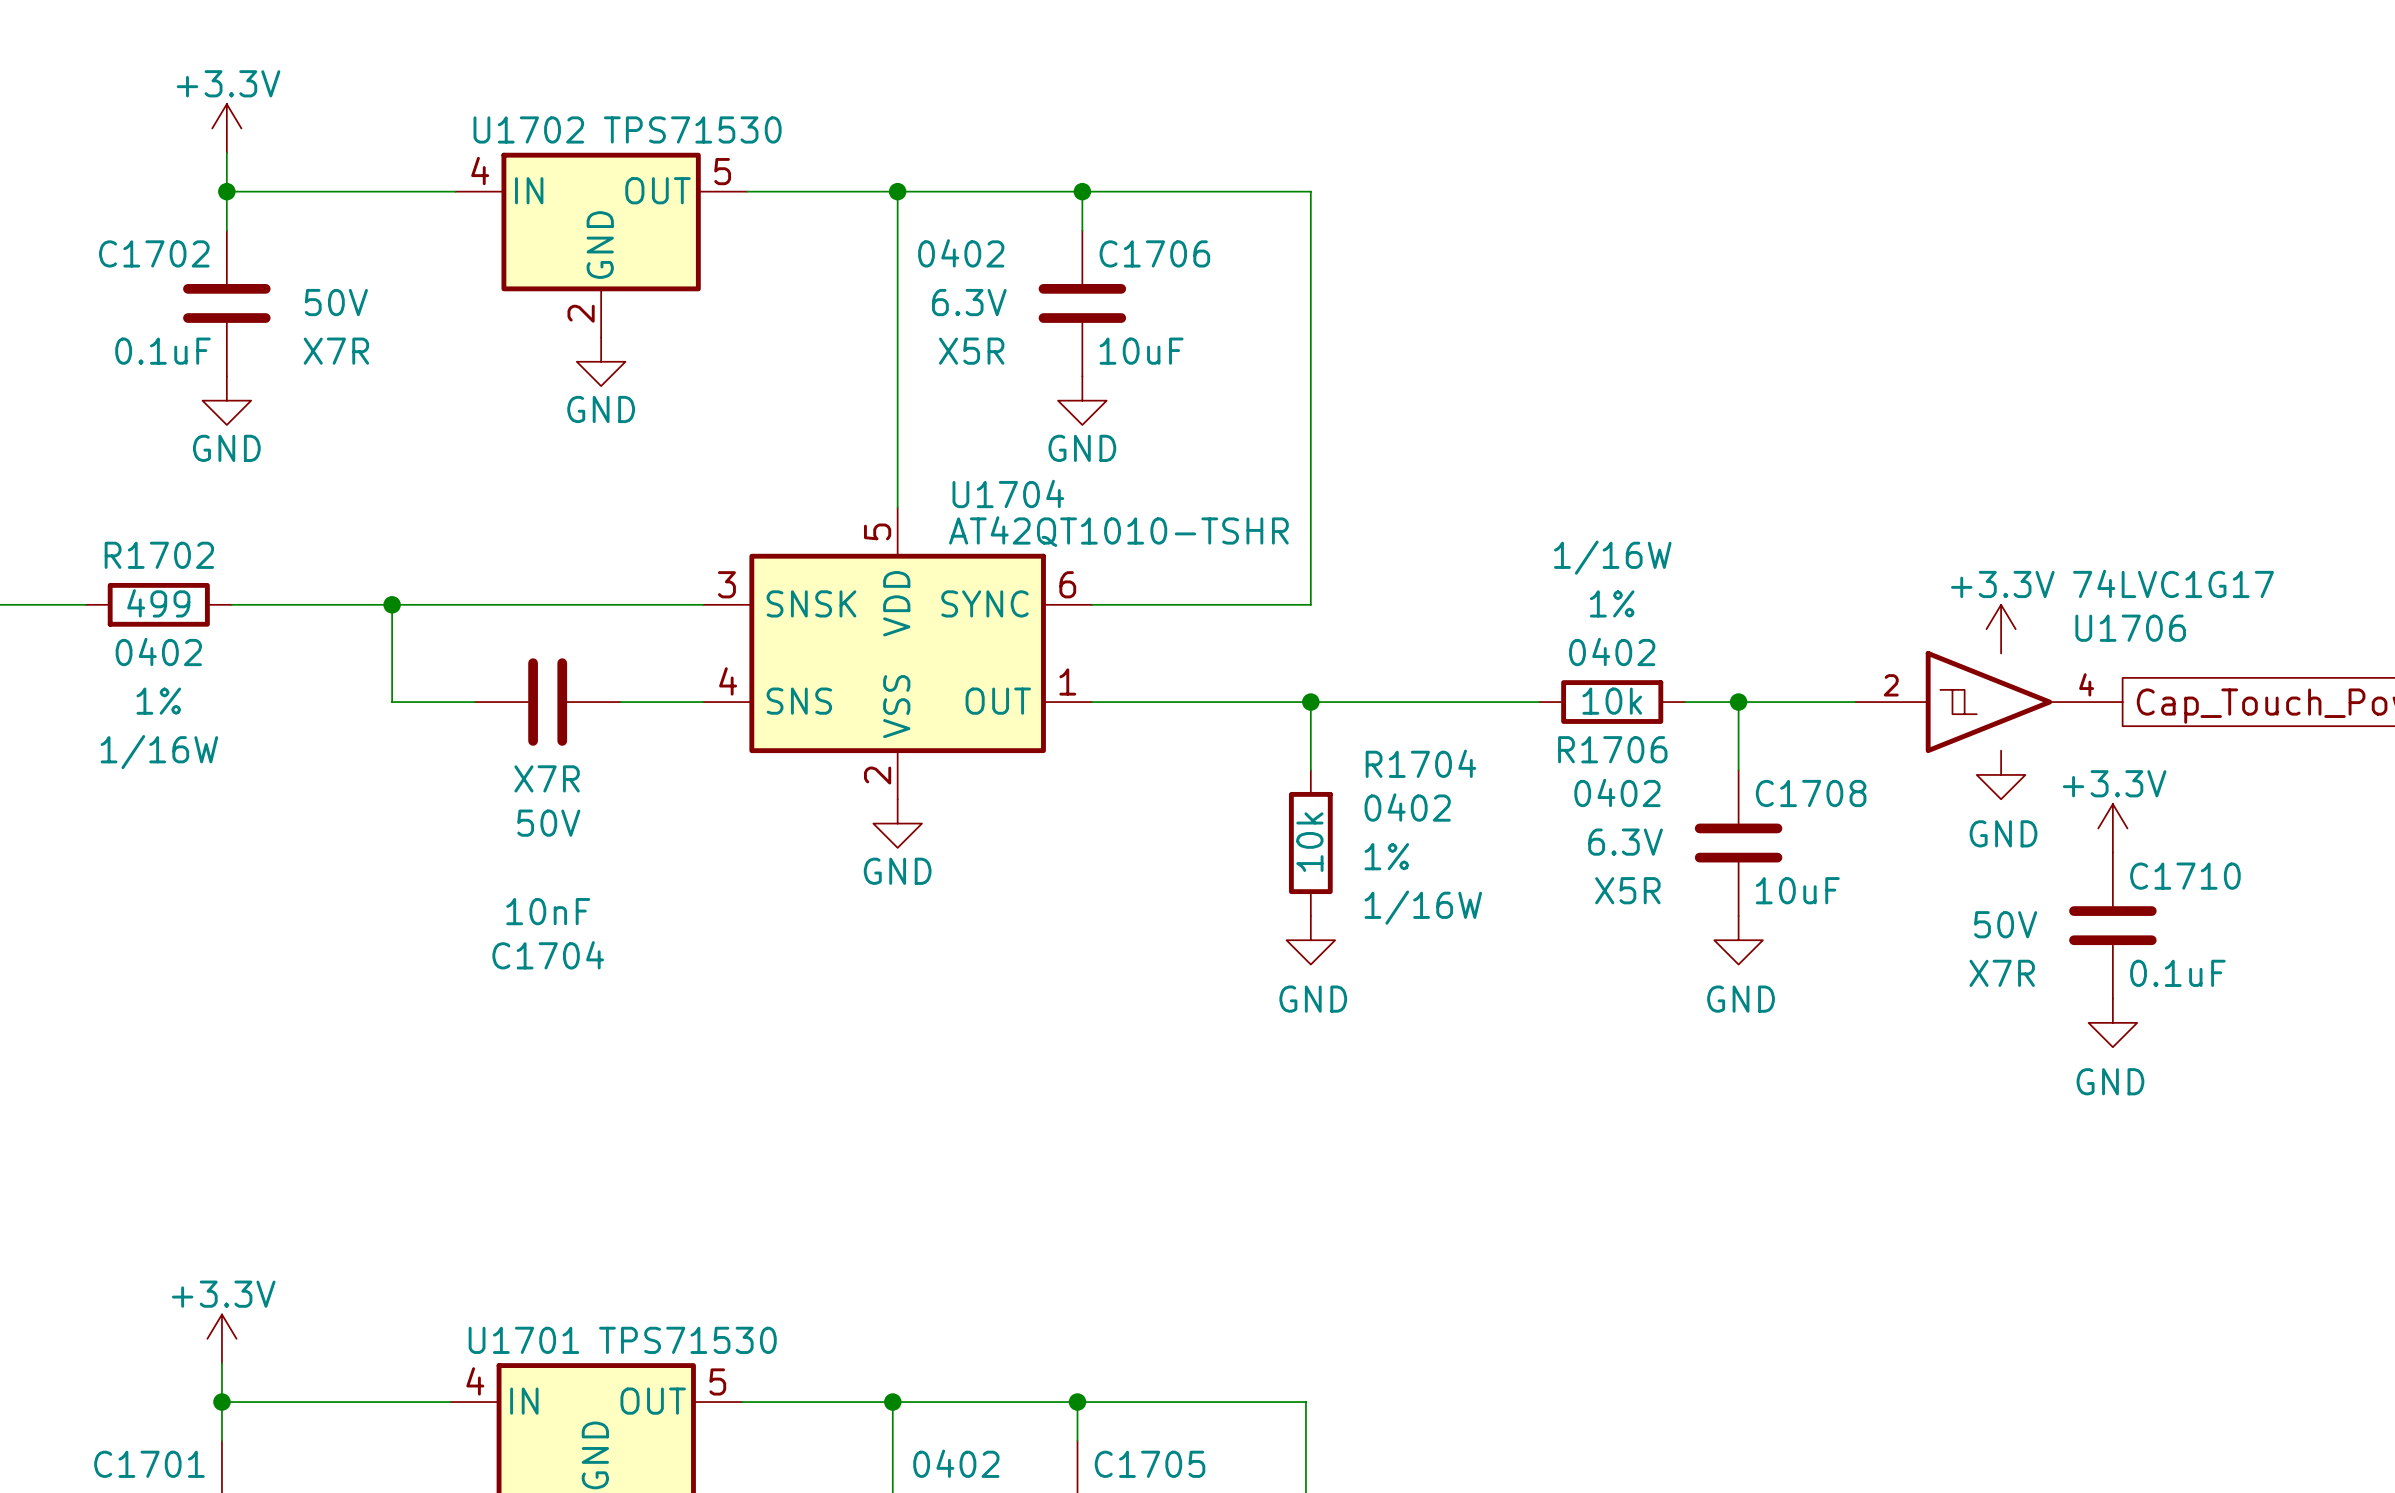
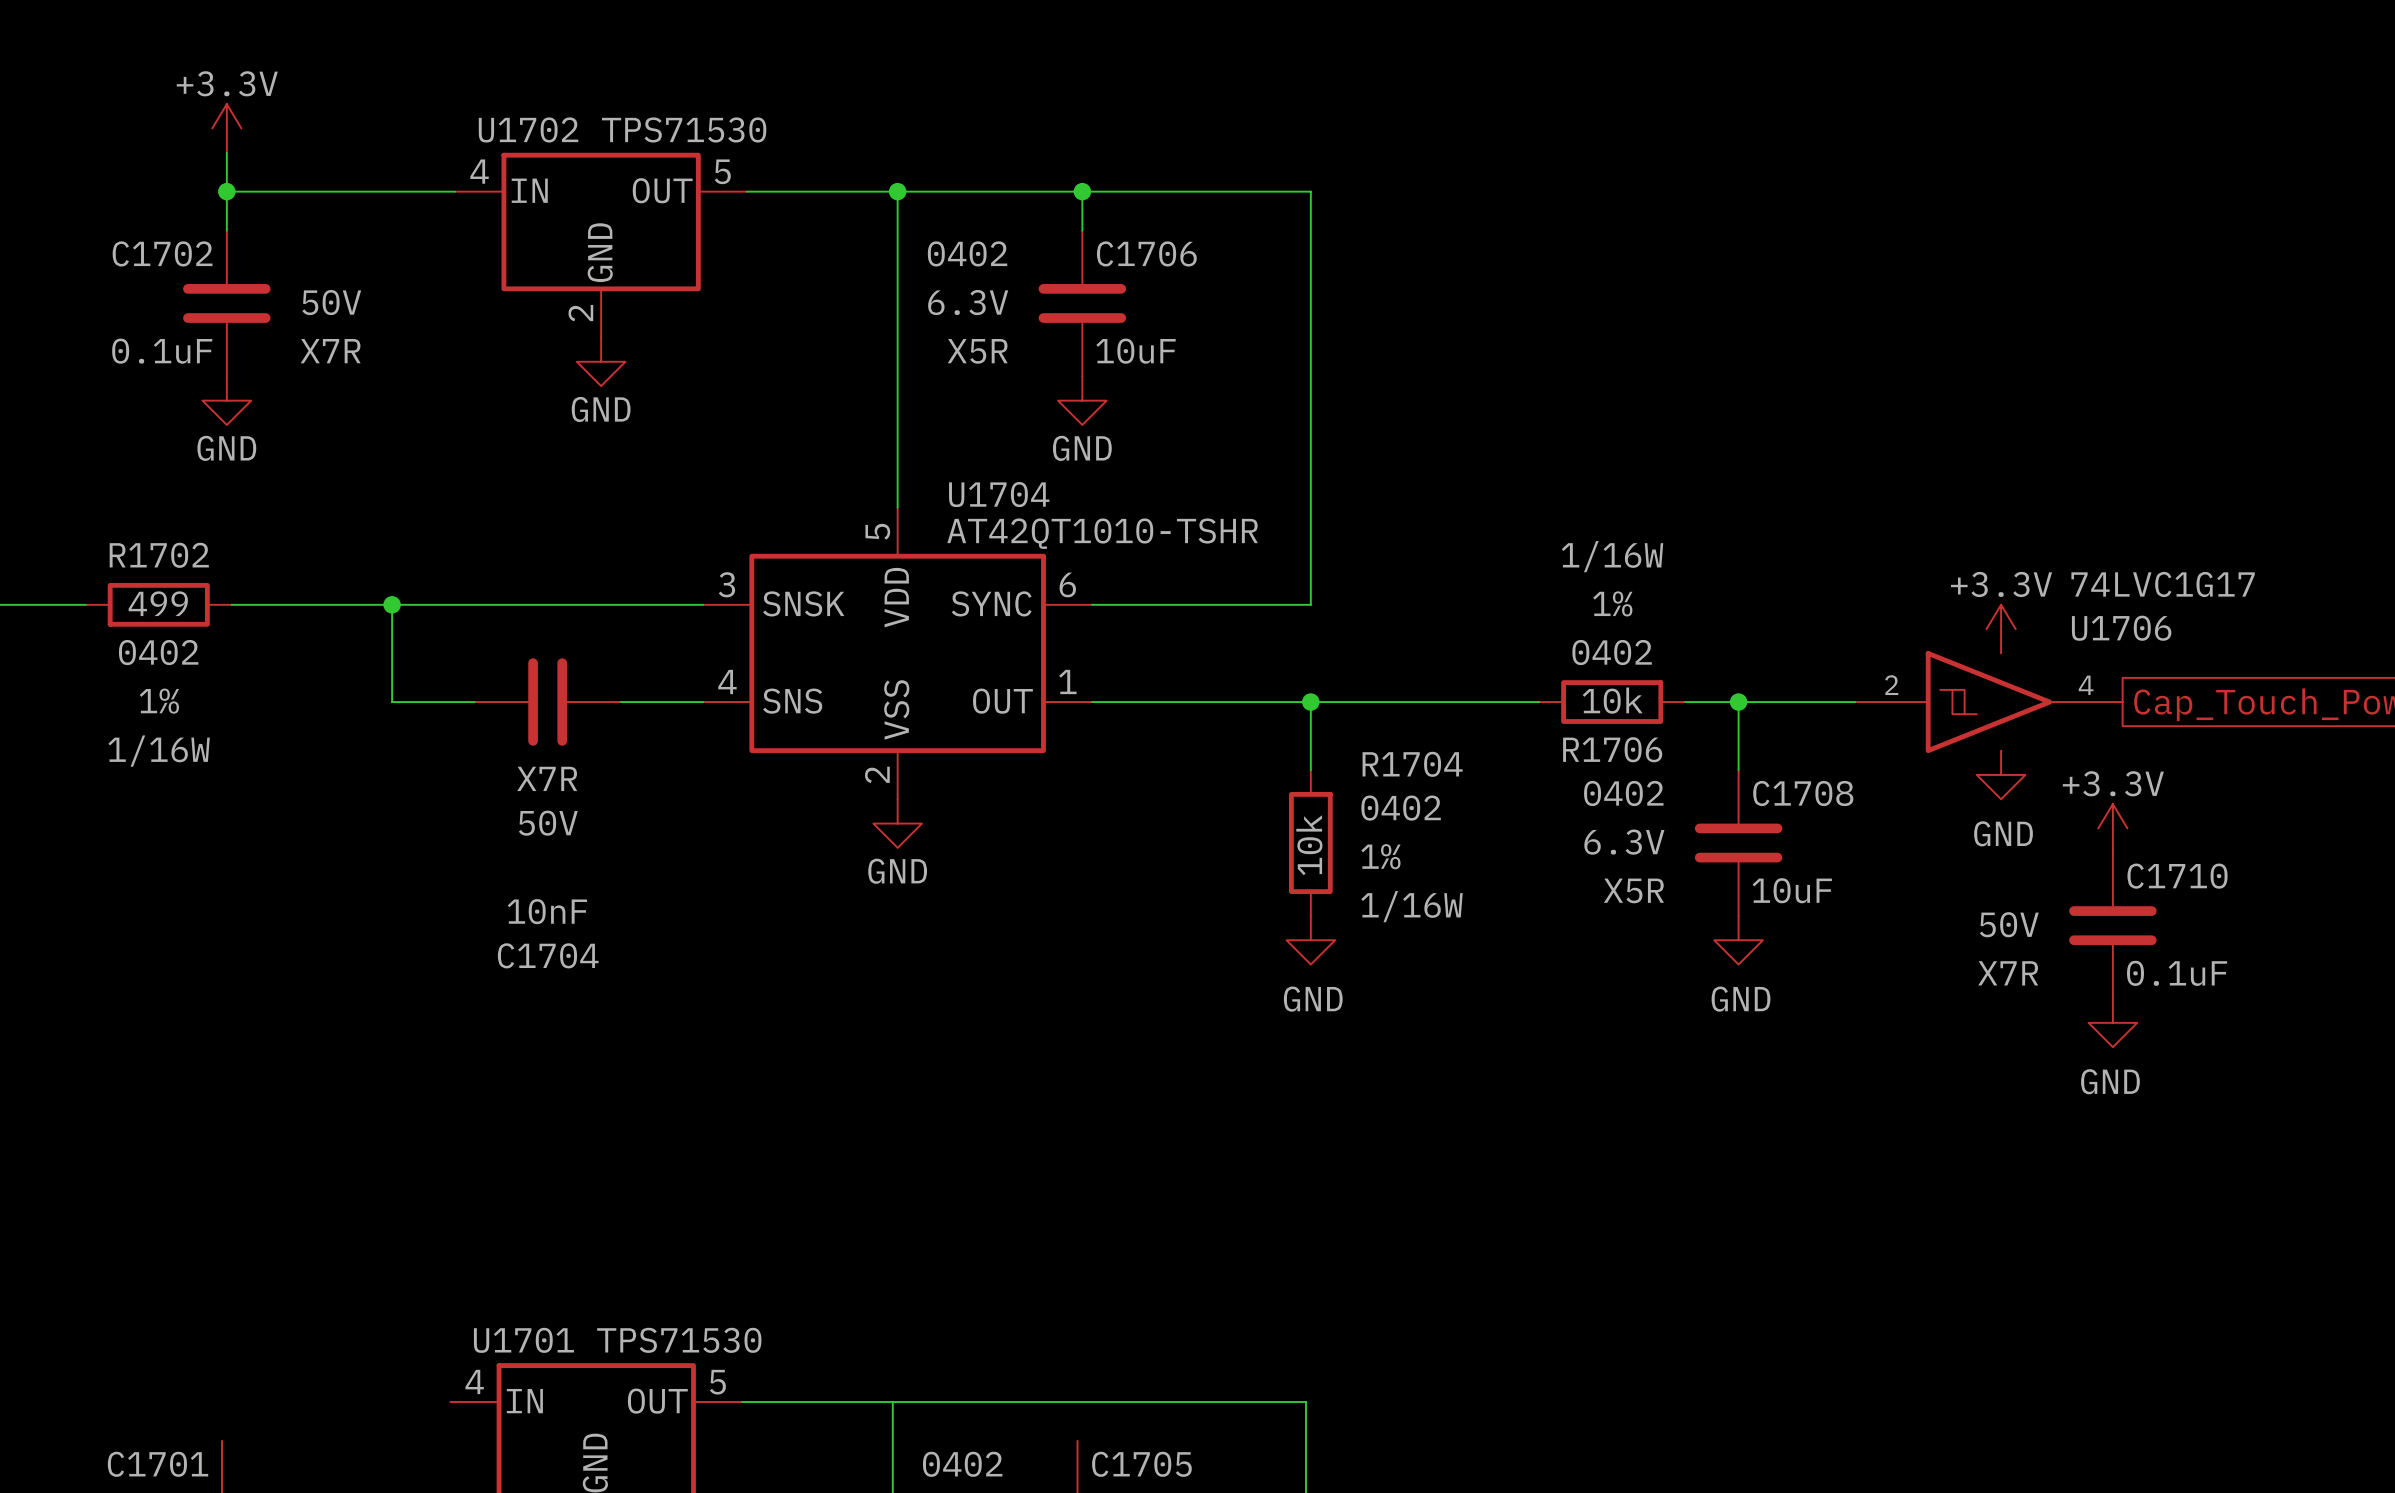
power symbol: +3.3V (221, 1338) -> none
wire: (221, 1363) (221, 1440) -> none
wire: (221, 1402) (450, 1402) -> none
junction: (221, 1402) -> none
junction: (892, 1402) -> none
wire: (1077, 1402) (1077, 1440) -> none
junction: (1077, 1402) -> none

